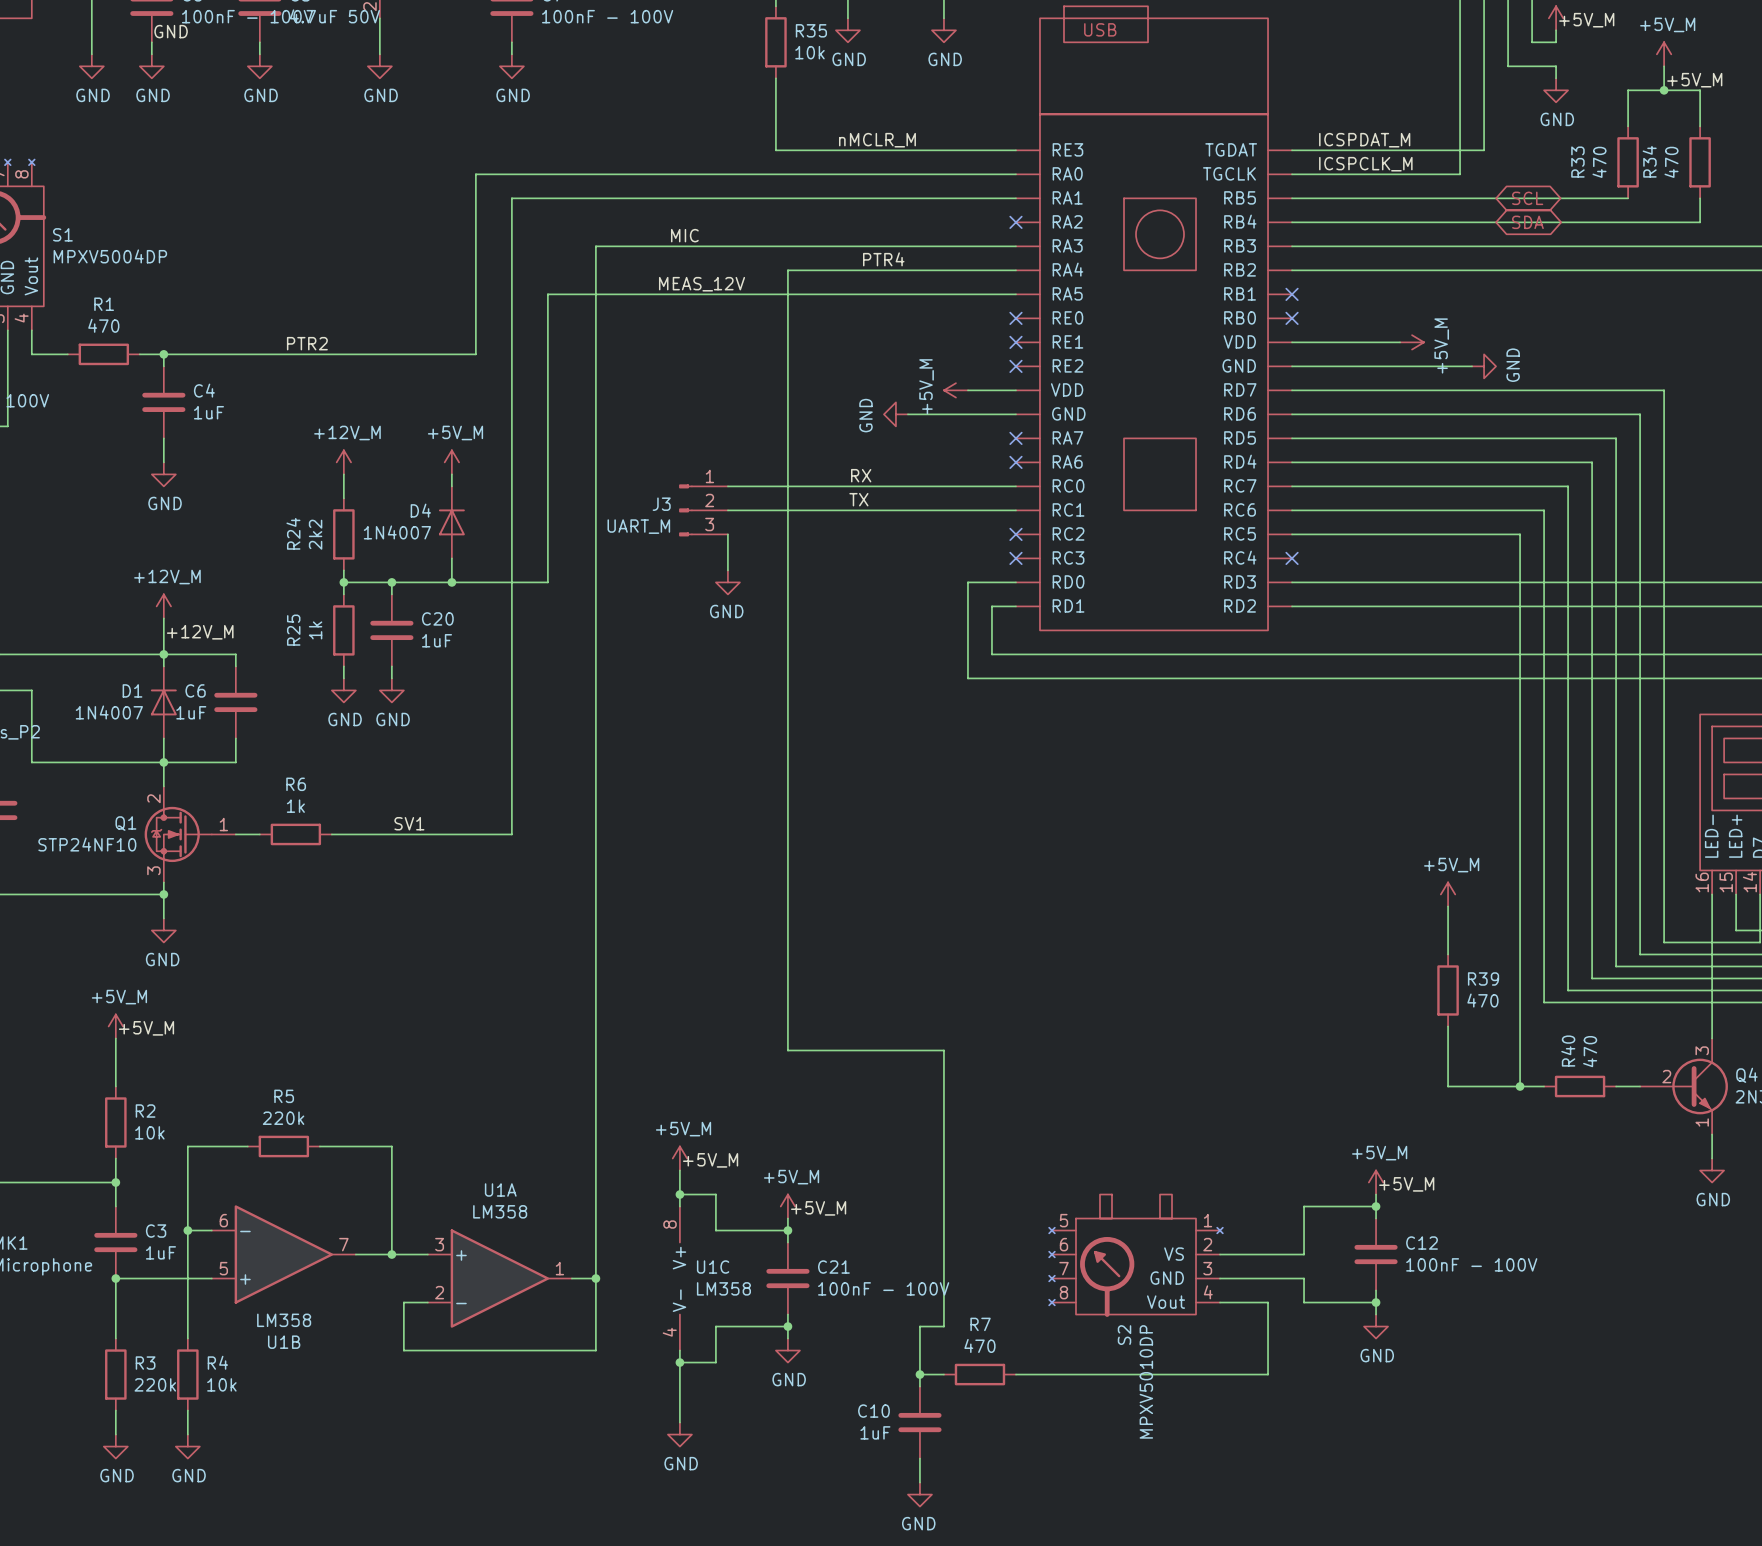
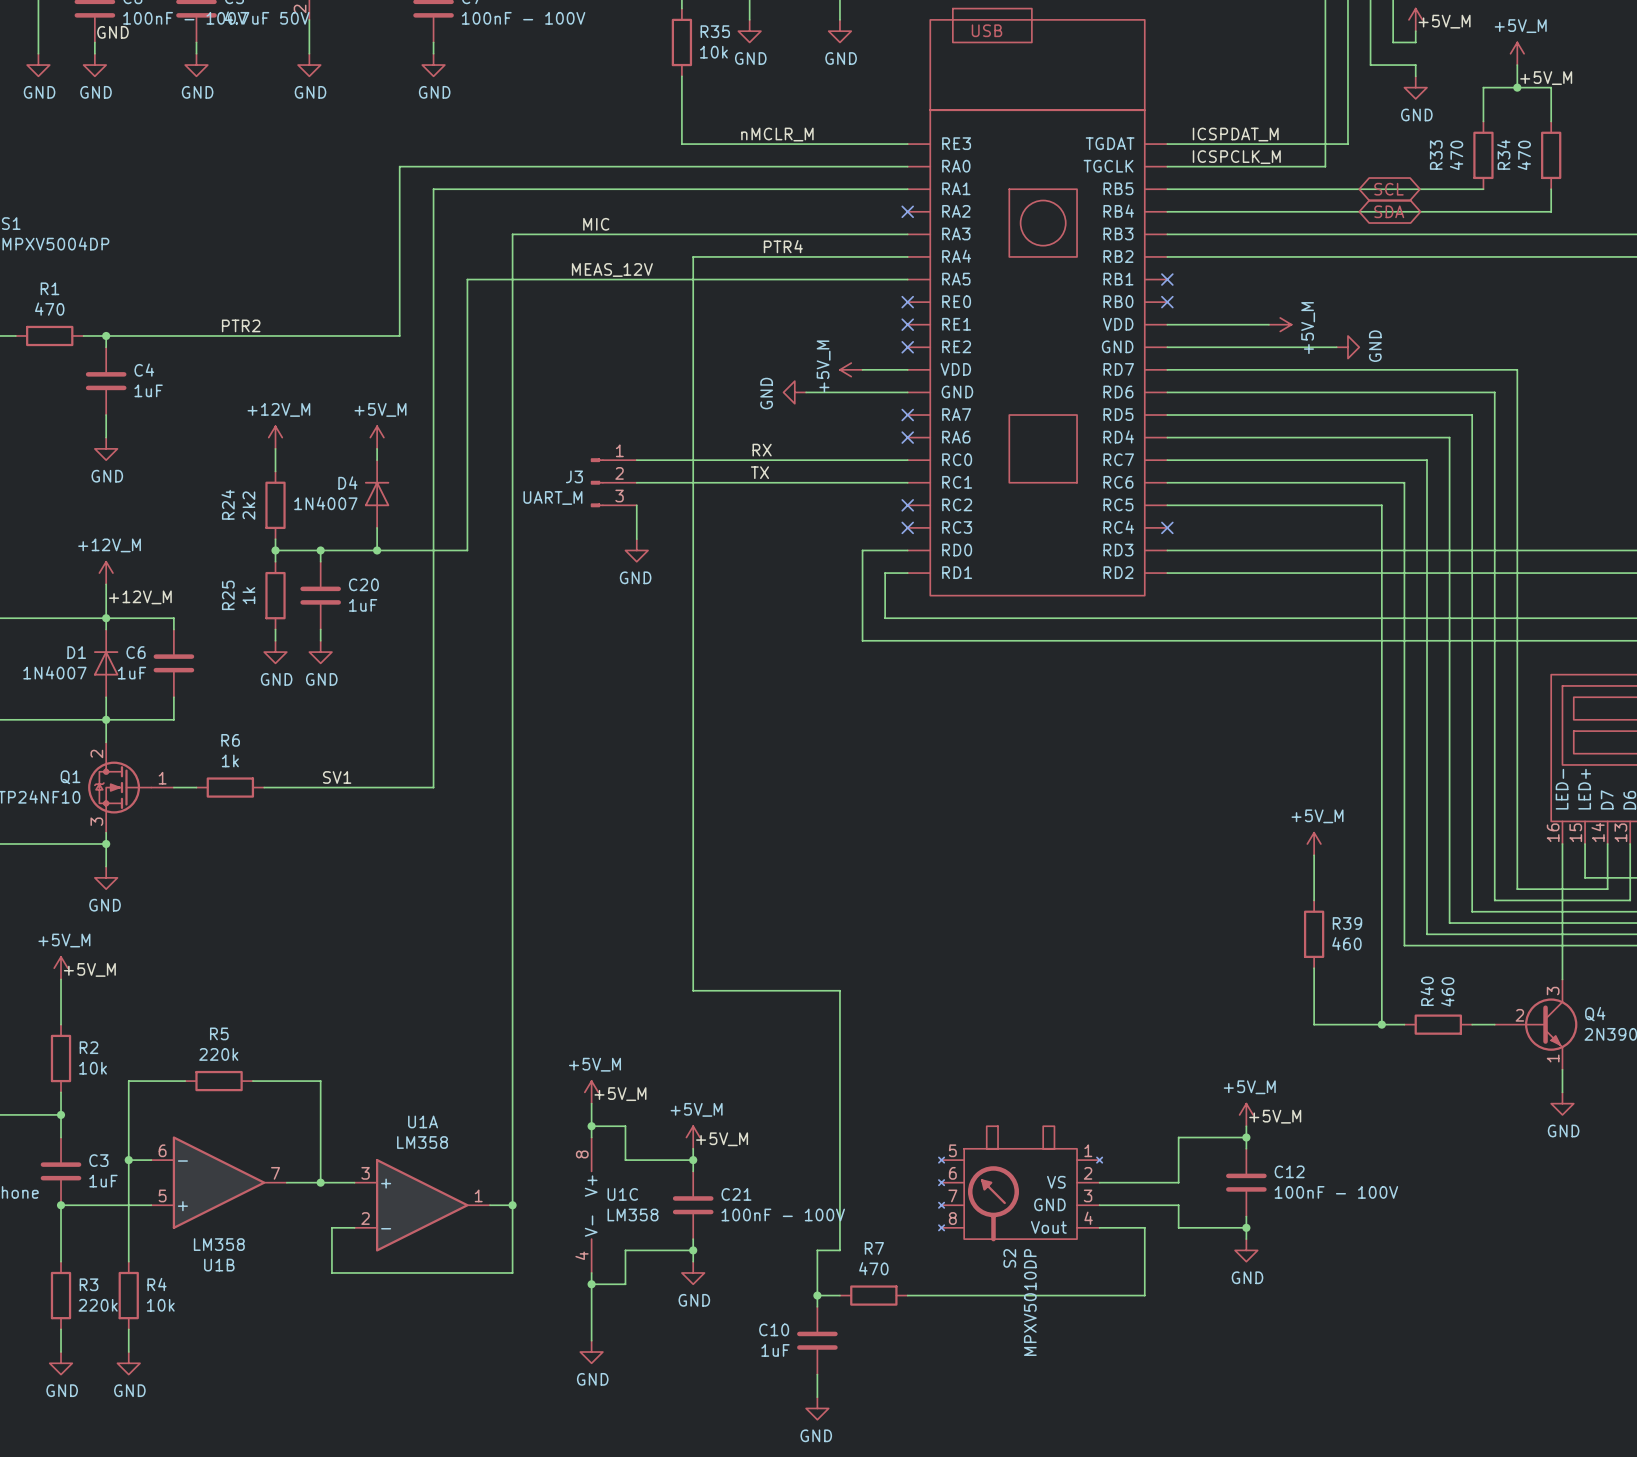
R39 value: 470 (1482, 1000) -> 460 (1346, 943)
R40 value: 470 (1590, 1051) -> 460 (1447, 991)

